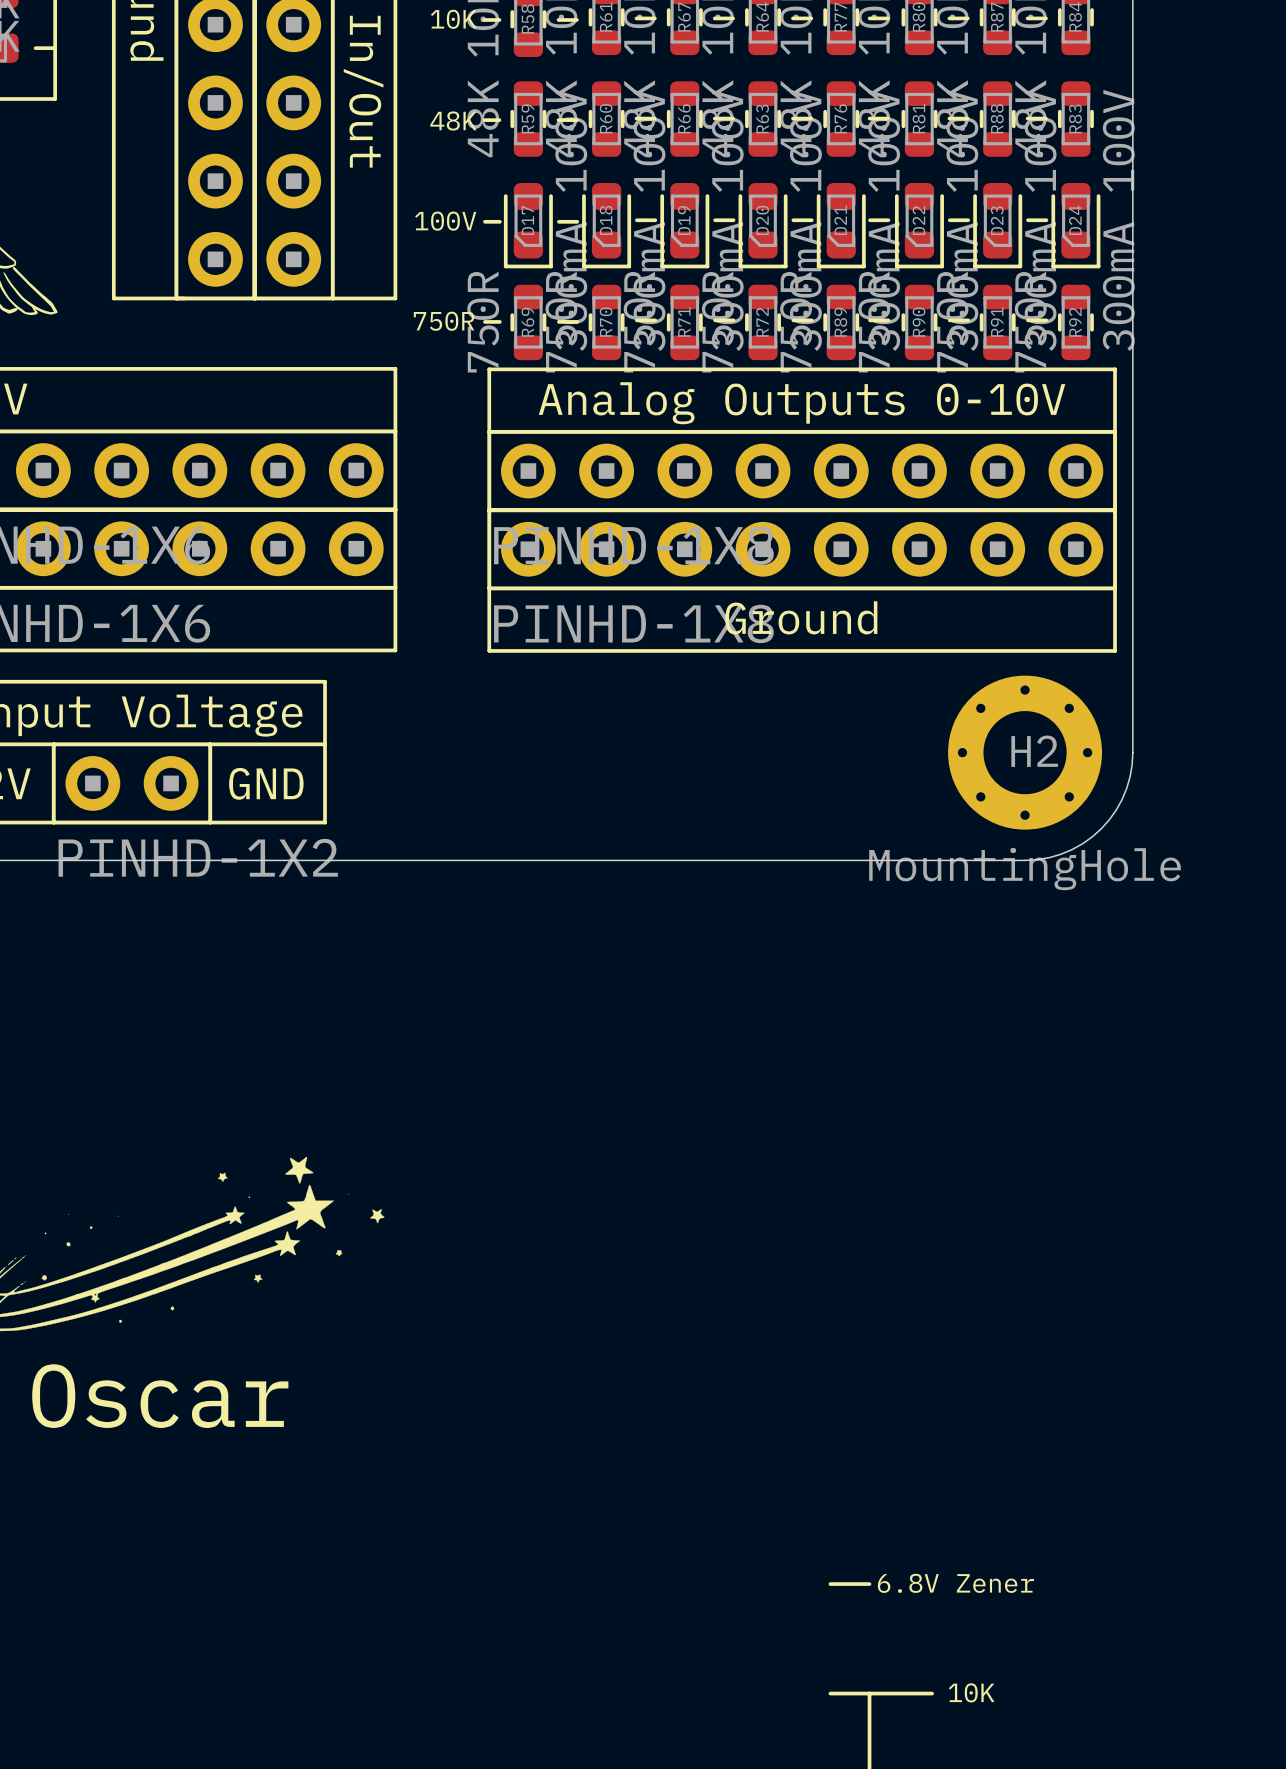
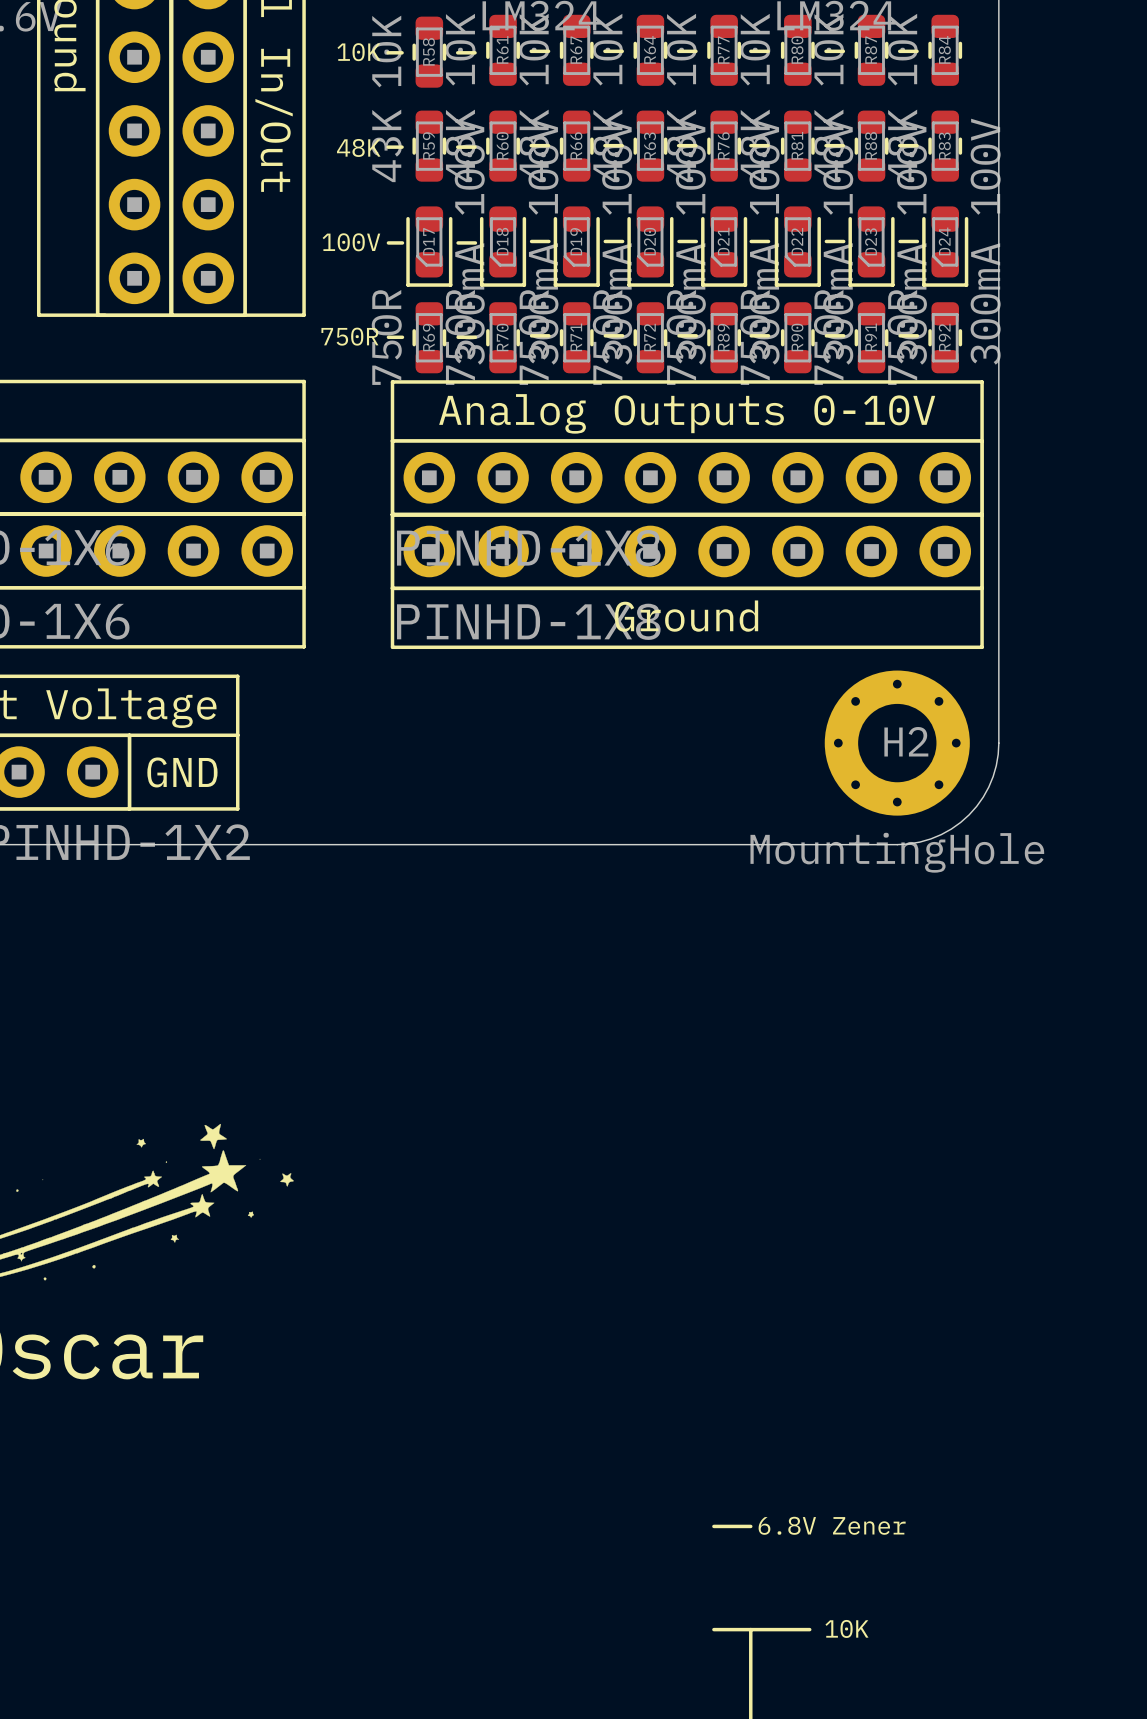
R59 value: 48K (483, 118) -> 43K (386, 145)

